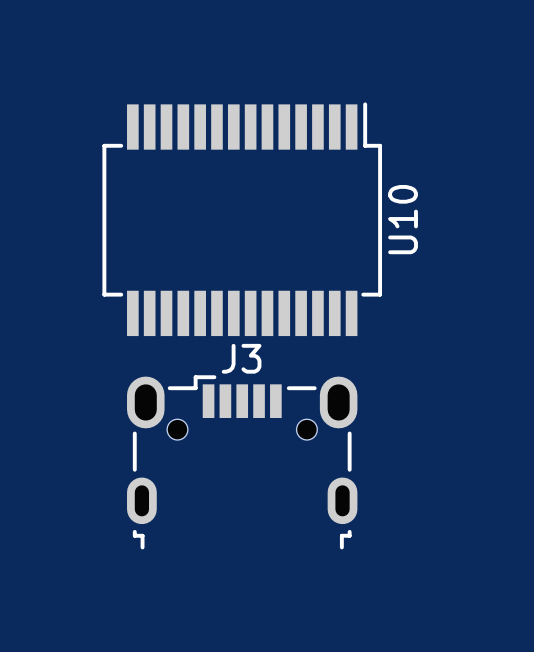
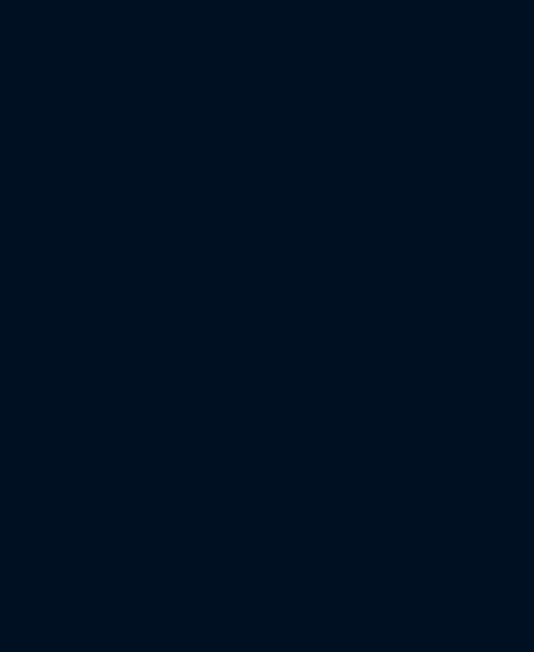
U10: (242, 219) -> none
J3: (242, 462) -> none

